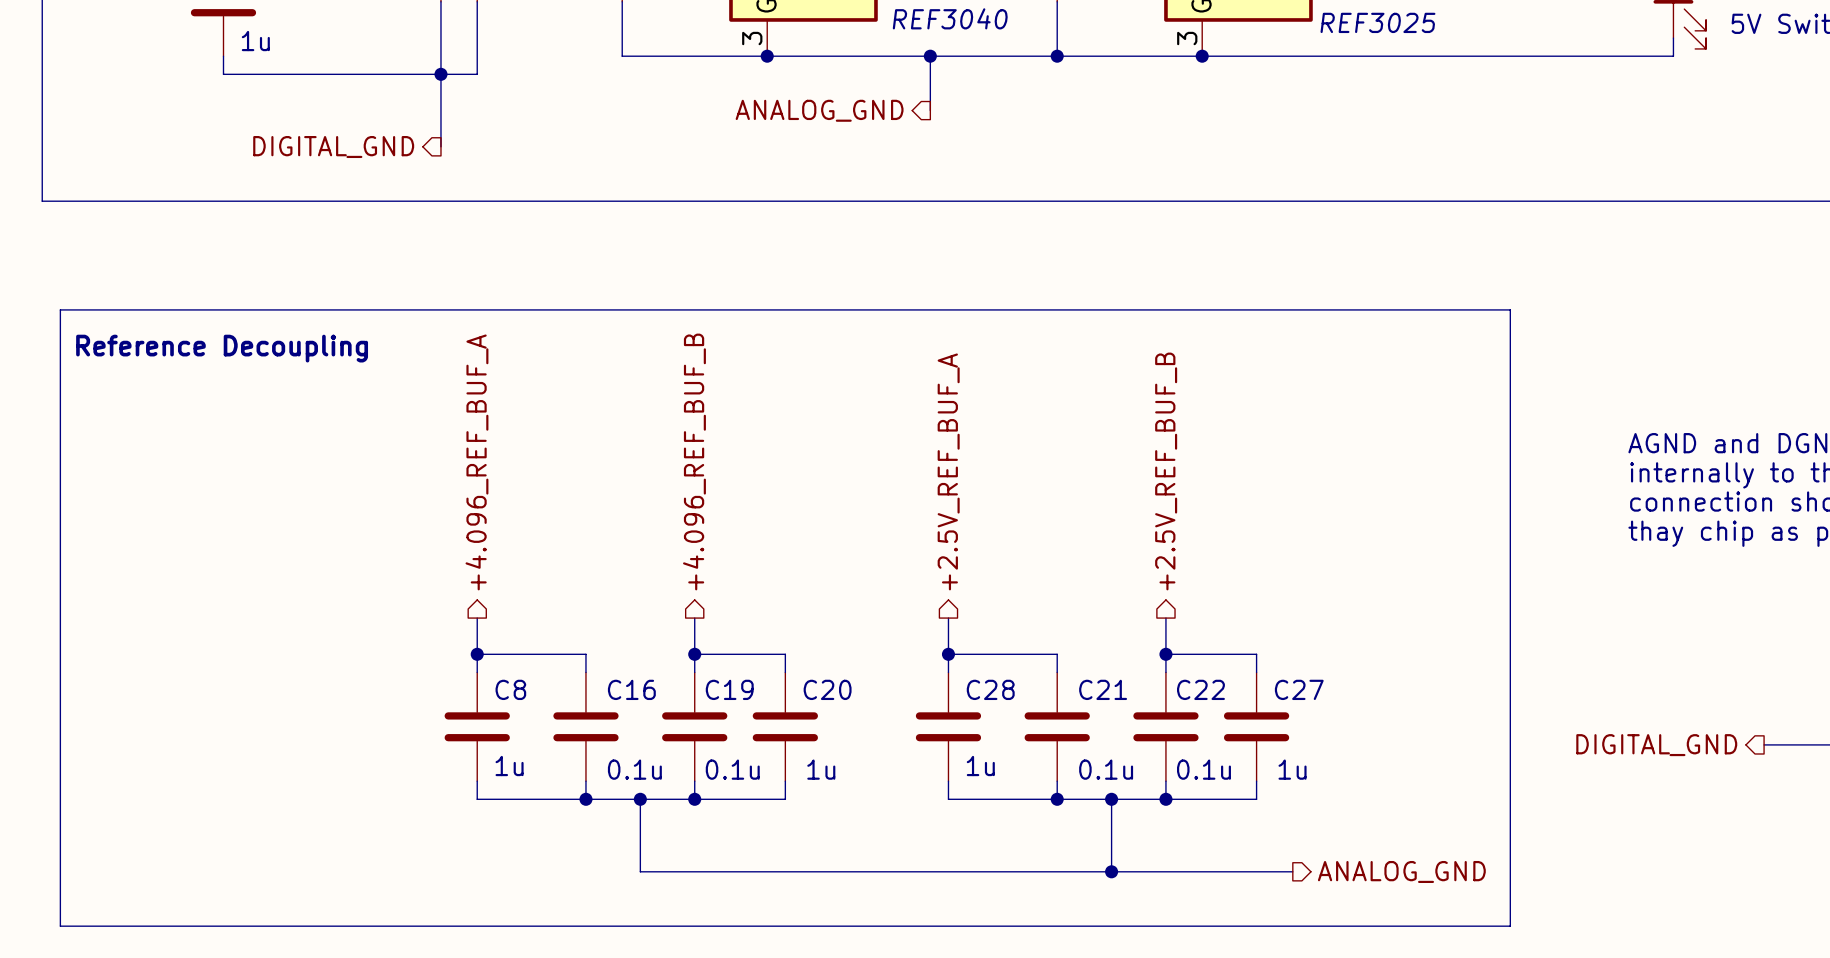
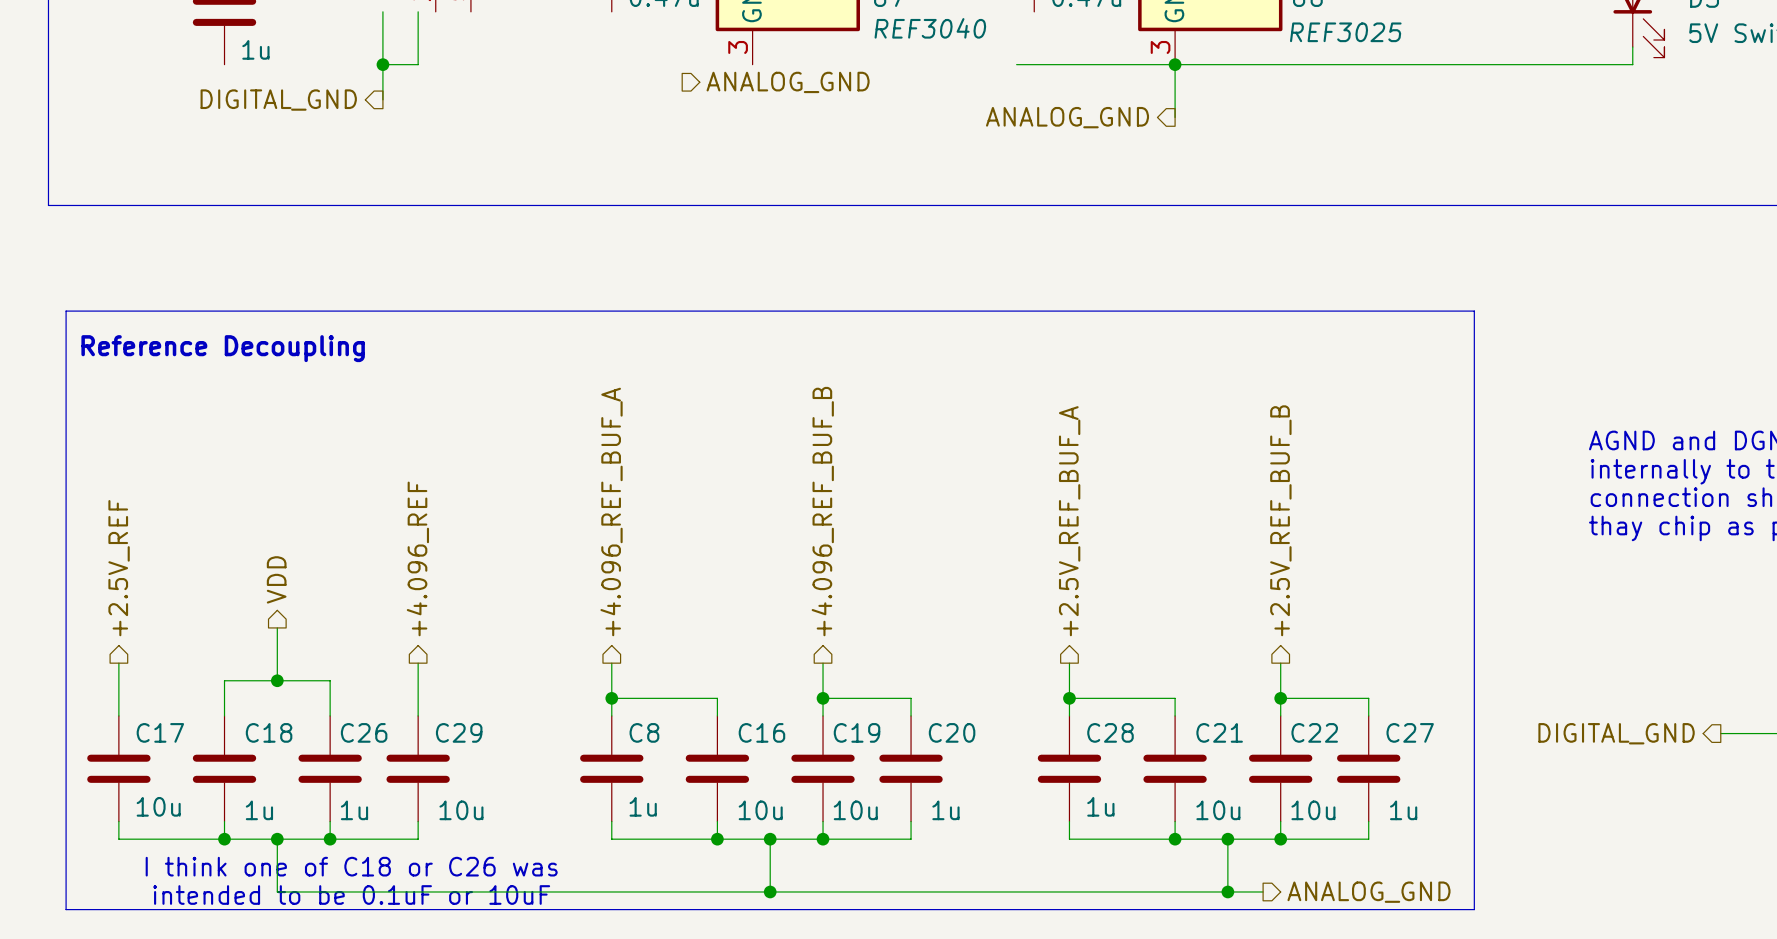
wire: none -> (382, 11) (382, 99)
wire: none -> (418, 11) (418, 64) (382, 64)
wire: (440, 1) (440, 146) -> none
wire: (477, 1) (477, 74) (223, 74) (223, 56) -> none
wire: (622, 1) (622, 56) (1039, 56) -> none
wire: (1057, 1) (1057, 56) -> (1175, 64) (1175, 117)
junction: (767, 56) -> none
wire: (930, 56) (930, 110) -> none
junction: (930, 56) -> none
junction: (1057, 56) -> none
junction position: (440, 74) -> (382, 64)
hierarchical label rotation: 0° (819, 110) -> 180° (788, 82)
hierarchical label: none -> ANALOG_GND (1067, 117)
hierarchical label position: DIGITAL_GND (333, 147) -> DIGITAL_GND (278, 100)
hierarchical label position: +4.096_REF_BUF_B (694, 461) -> +4.096_REF_BUF_B (822, 511)
hierarchical label position: +4.096_REF_BUF_A (476, 462) -> +4.096_REF_BUF_A (611, 511)
hierarchical label position: +2.5V_REF_BUF_A (948, 471) -> +2.5V_REF_BUF_A (1069, 521)
hierarchical label position: +2.5V_REF_BUF_B (1166, 471) -> +2.5V_REF_BUF_B (1280, 520)
hierarchical label: none -> +4.096_REF (417, 558)
hierarchical label: none -> +2.5V_REF (119, 568)
hierarchical label: none -> VDD (276, 579)
wire: (477, 618) (477, 672) -> (611, 663) (611, 715)
wire: (694, 618) (694, 672) -> (823, 663) (823, 715)
wire: (948, 618) (948, 672) -> (1069, 663) (1069, 715)
wire: (1165, 618) (1165, 672) -> (1280, 663) (1280, 715)
wire: none -> (277, 627) (277, 680)
wire: (477, 654) (585, 654) (585, 672) -> (611, 698) (717, 698) (717, 715)
junction: (477, 654) -> none
wire: (694, 654) (785, 654) (785, 672) -> (823, 698) (911, 698) (911, 715)
junction: (694, 654) -> none
wire: (948, 654) (1057, 654) (1057, 672) -> (1069, 698) (1175, 698) (1175, 715)
junction: (948, 654) -> none
wire: (1165, 654) (1256, 654) (1256, 672) -> (1280, 698) (1368, 698) (1368, 715)
junction: (1165, 654) -> none
wire: none -> (118, 663) (118, 715)
wire: none -> (418, 663) (418, 715)
junction: none -> (277, 680)
junction: none -> (611, 698)
junction: none -> (823, 698)
junction: none -> (1069, 698)
junction: none -> (1280, 698)
wire: none -> (224, 715) (224, 680) (330, 680) (330, 715)
C8 position: (477, 726) -> (611, 768)
C16 position: (585, 726) -> (717, 768)
C19 position: (694, 726) -> (823, 768)
C20 position: (785, 726) -> (911, 768)
C28 position: (948, 726) -> (1069, 768)
C21 position: (1057, 726) -> (1175, 768)
C22 position: (1165, 726) -> (1280, 768)
C27 position: (1256, 726) -> (1368, 768)
C16 value: 0.1u (634, 769) -> 10u (760, 810)
C19 value: 0.1u (732, 769) -> 10u (855, 810)
C21 value: 0.1u (1106, 769) -> 10u (1218, 810)
C22 value: 0.1u (1203, 769) -> 10u (1313, 810)
C17: none -> 10u (118, 768)
C18: none -> 1u (224, 768)
C26: none -> 1u (330, 768)
C29: none -> 10u (418, 768)
wire: (477, 781) (477, 799) (785, 799) (785, 781) -> (611, 821) (611, 839) (911, 839) (911, 821)
wire: (585, 781) (585, 799) -> (717, 821) (717, 839)
wire: (694, 781) (694, 799) -> (823, 821) (823, 839)
wire: (948, 781) (948, 799) (1256, 799) (1256, 781) -> (1069, 821) (1069, 839) (1368, 839) (1368, 821)
wire: (1057, 781) (1057, 799) -> (1175, 821) (1175, 839)
wire: (1165, 781) (1165, 799) -> (1280, 821) (1280, 839)
junction: (585, 799) -> none
wire: (640, 799) (640, 871) (1292, 871) -> none
junction: (640, 799) -> none
junction: (694, 799) -> none
junction: (1057, 799) -> none
wire: (1111, 799) (1111, 871) -> none
junction: (1111, 799) -> none
junction: (1165, 799) -> none
wire: none -> (118, 821) (118, 839) (418, 839) (418, 821)
wire: none -> (224, 821) (224, 839)
wire: none -> (330, 821) (330, 839)
junction: none -> (224, 839)
wire: none -> (277, 839) (277, 891) (1263, 891)
junction: none -> (277, 839)
junction: none -> (330, 839)
junction: none -> (717, 839)
wire: none -> (770, 839) (770, 891)
junction: none -> (770, 839)
junction: none -> (823, 839)
junction: none -> (1175, 839)
wire: none -> (1227, 839) (1227, 891)
junction: none -> (1227, 839)
junction: none -> (1280, 839)
junction: (1111, 871) -> none
hierarchical label position: ANALOG_GND (1401, 871) -> ANALOG_GND (1368, 892)
text: none -> I think one of C18 or C26 was (351, 866)
junction: none -> (770, 891)
junction: none -> (1227, 891)
text: none -> intended to be 0.1uF or 10uF (351, 895)

